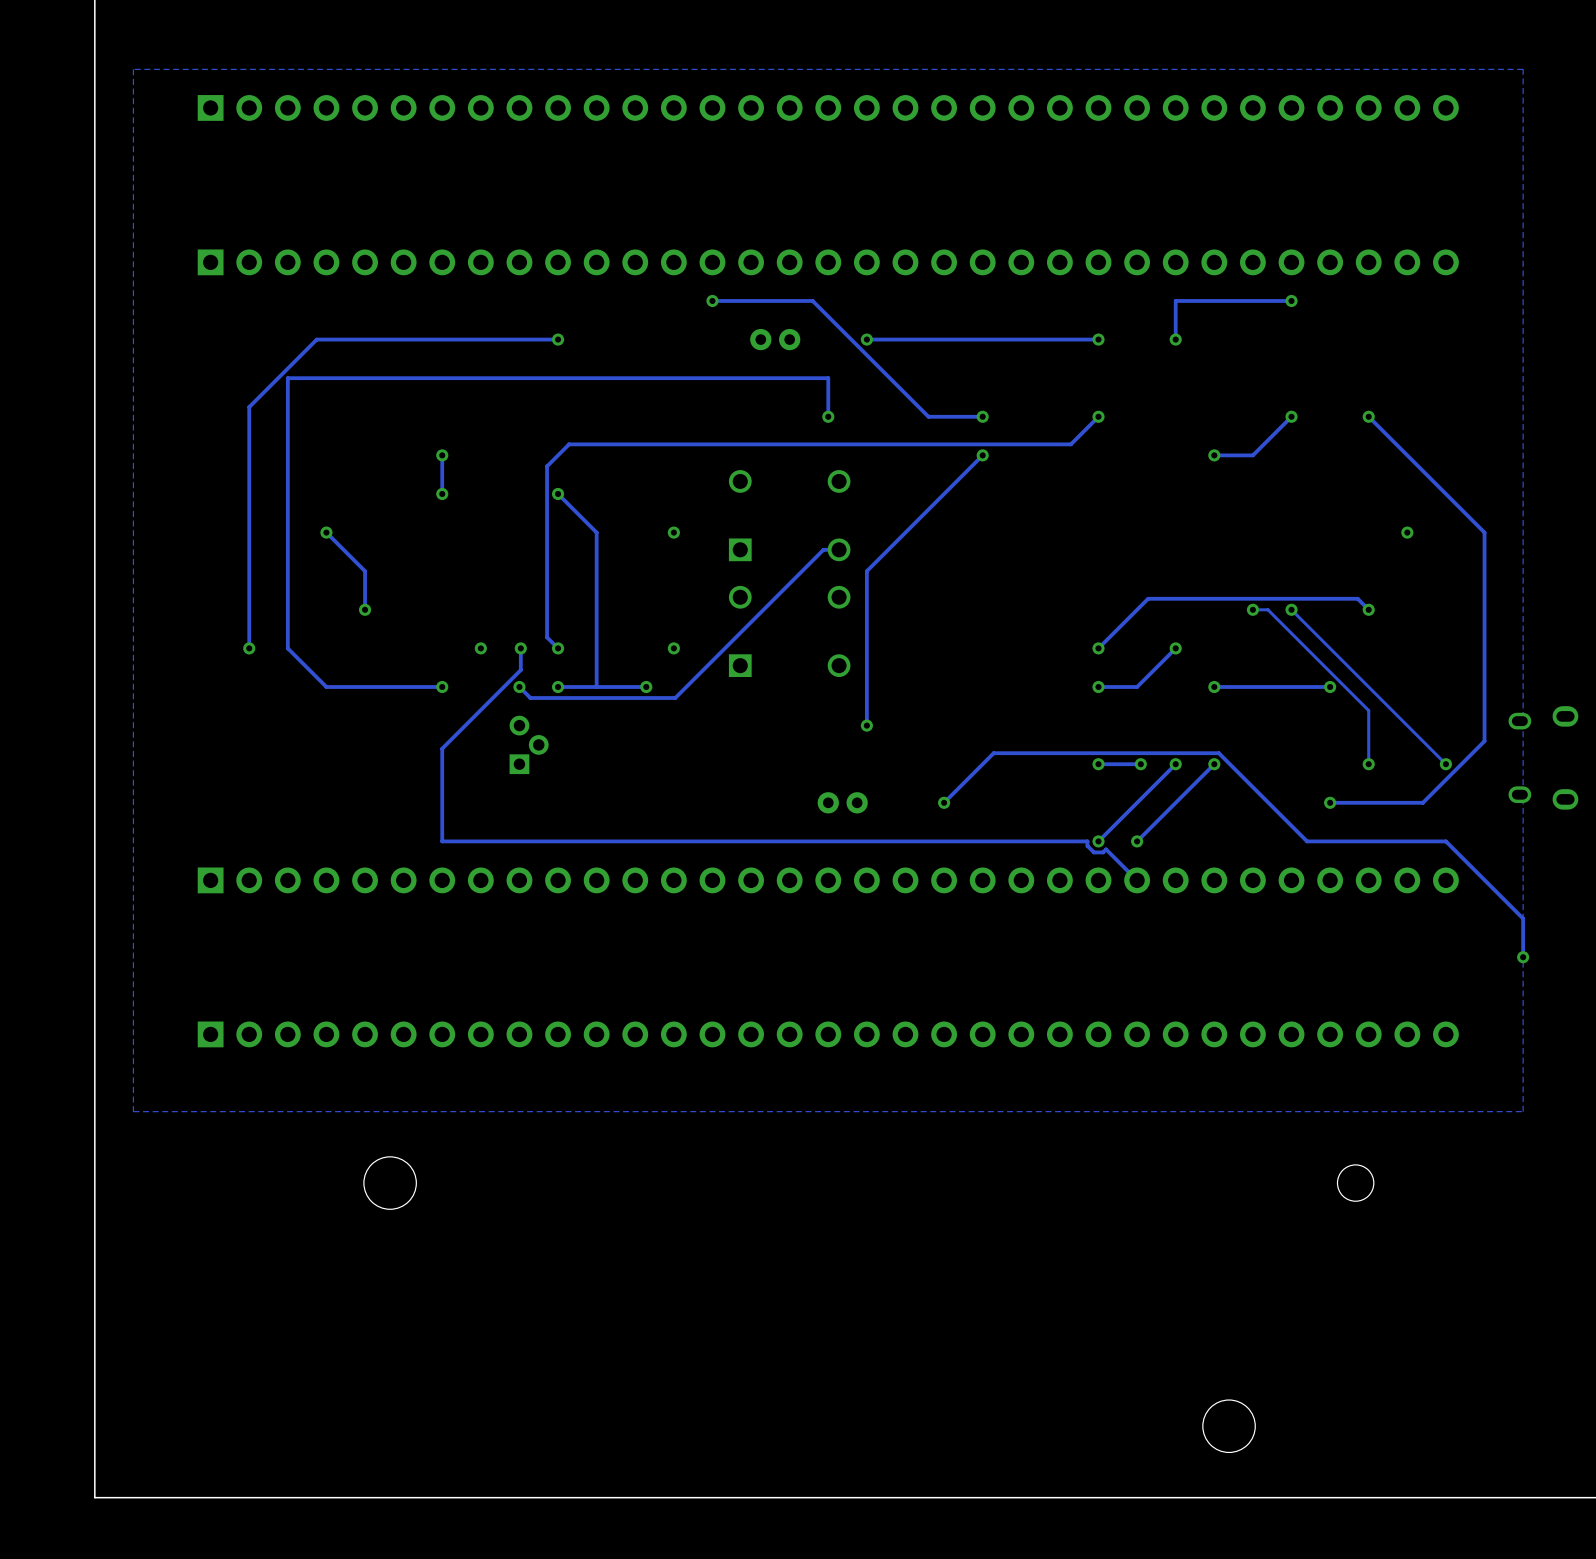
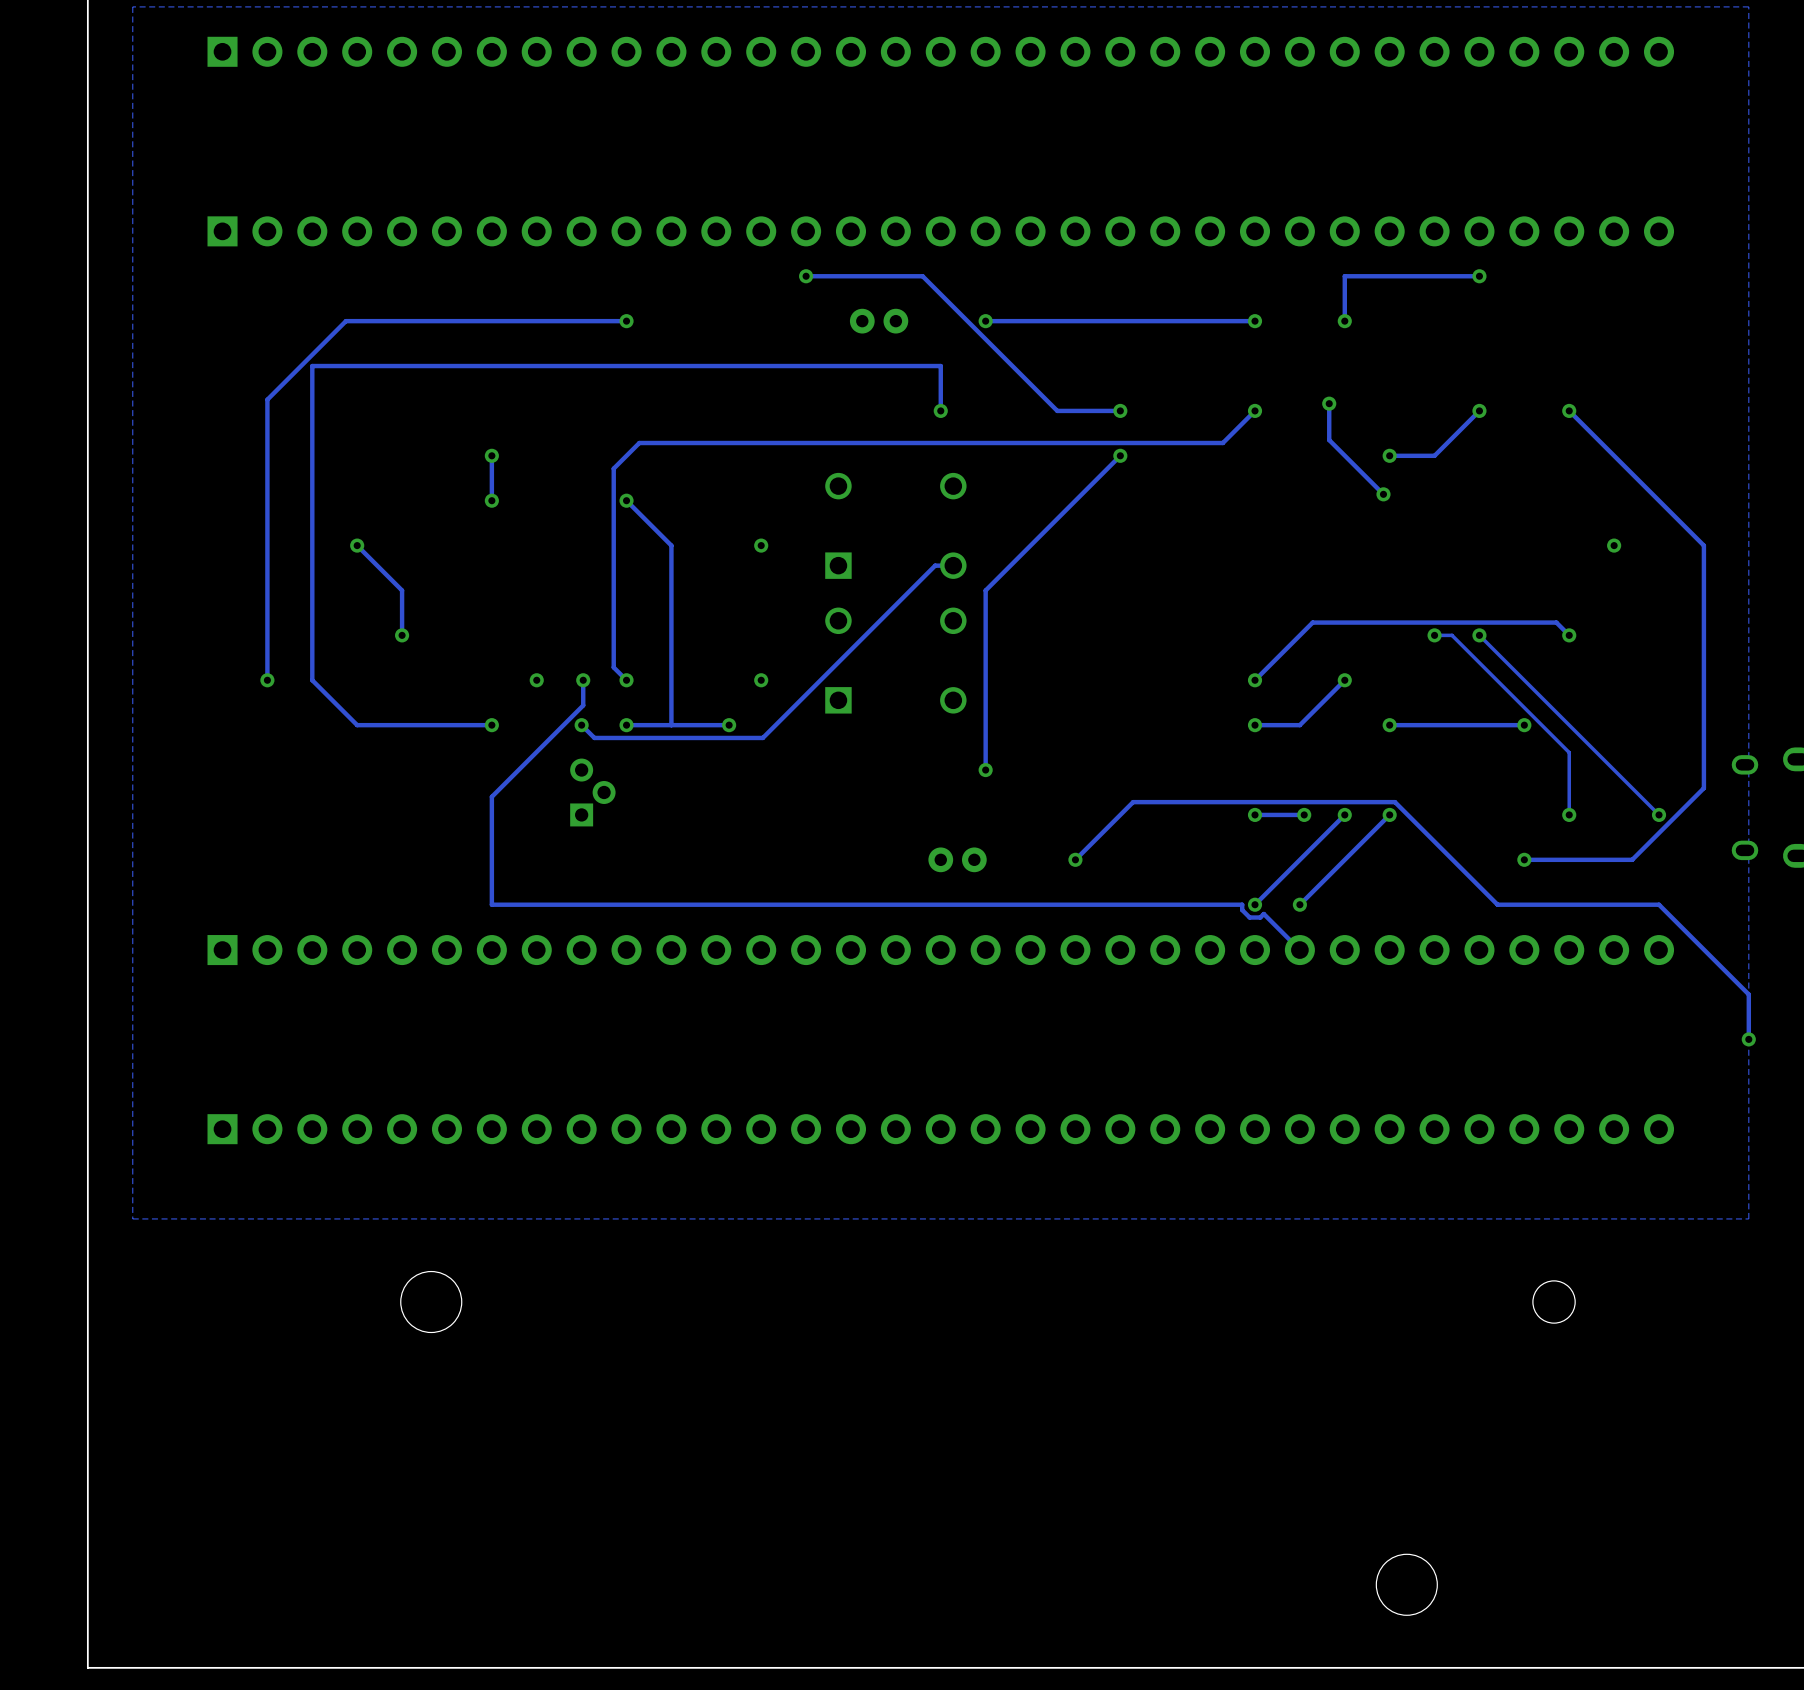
track: none -> (1329, 403) (1329, 440) (1383, 494)
via: none -> (1329, 403)
via: none -> (1383, 494)

